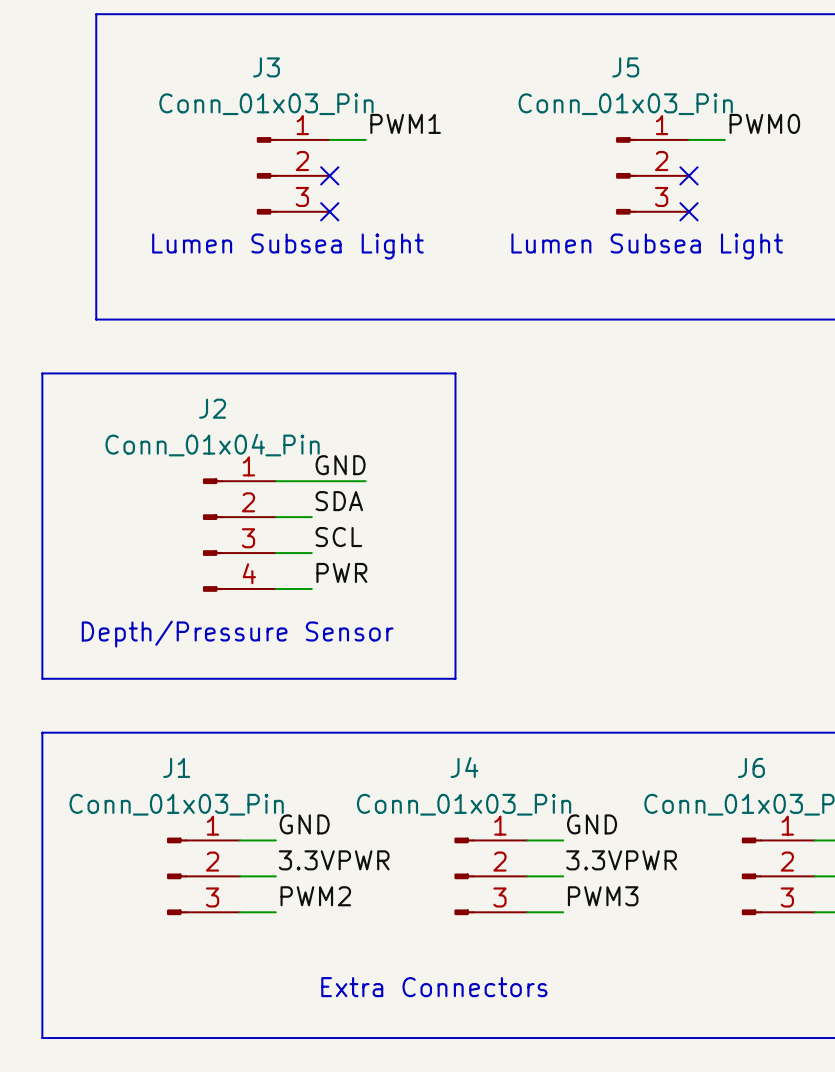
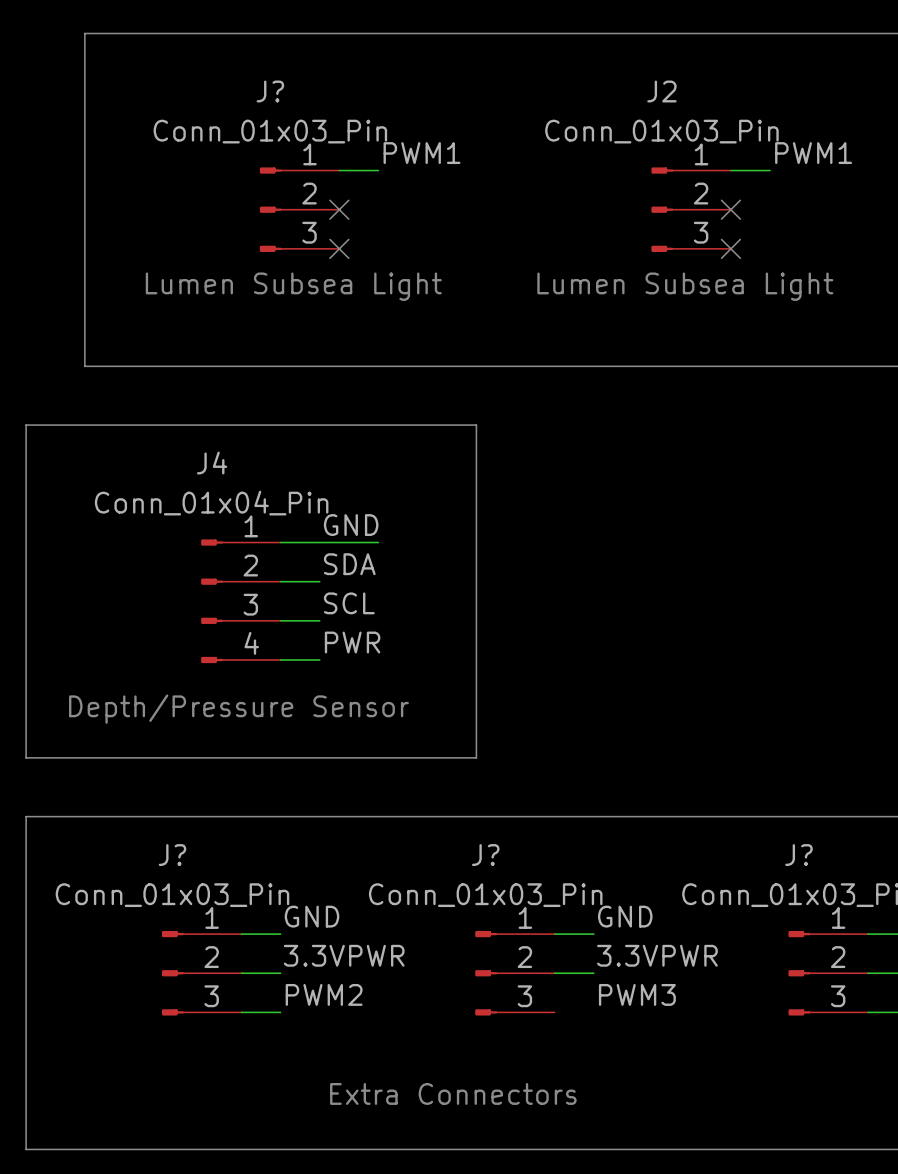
J3 name: J3 (266, 67) -> J? (270, 91)
J5 name: J5 (625, 67) -> J2 (661, 91)
label: PWM0 (764, 123) -> PWM1 (813, 153)
J2 name: J2 (212, 408) -> J4 (212, 463)
J1 name: J1 (176, 767) -> J? (172, 855)
J4 name: J4 (464, 767) -> J? (485, 855)
J6 name: J6 (751, 767) -> J? (798, 855)
wire: (527, 912) (563, 912) -> none

